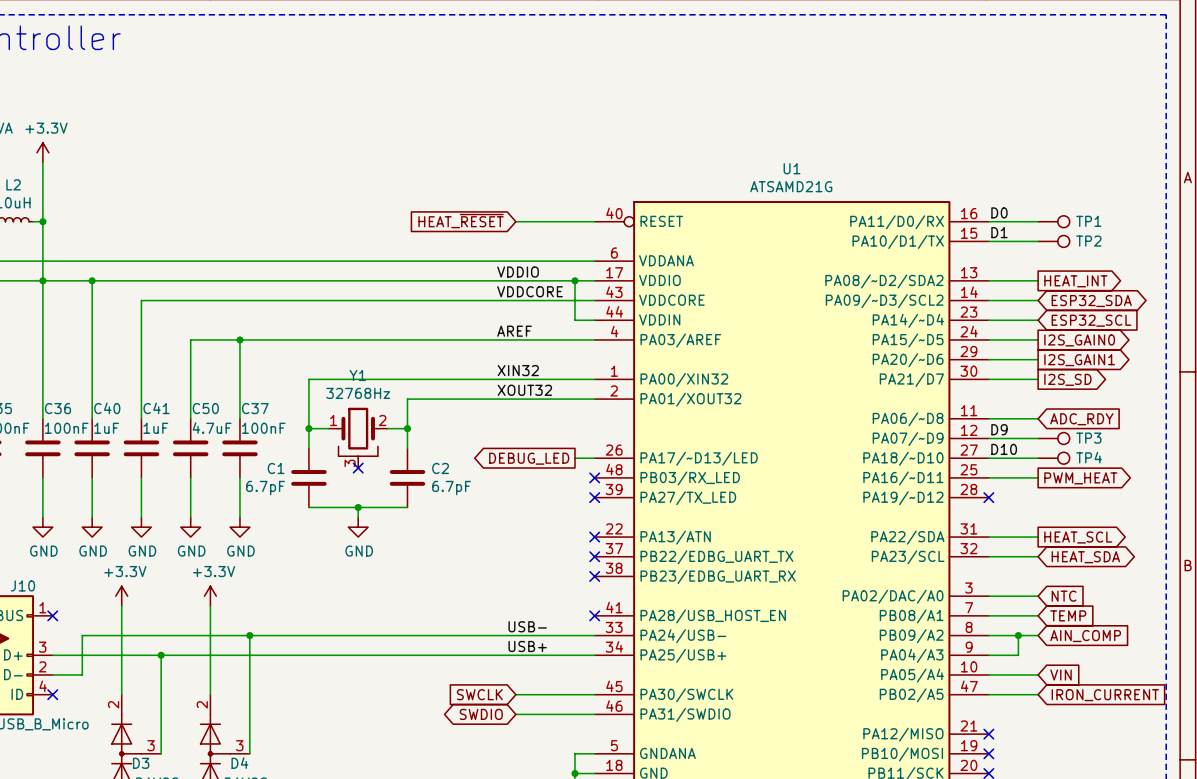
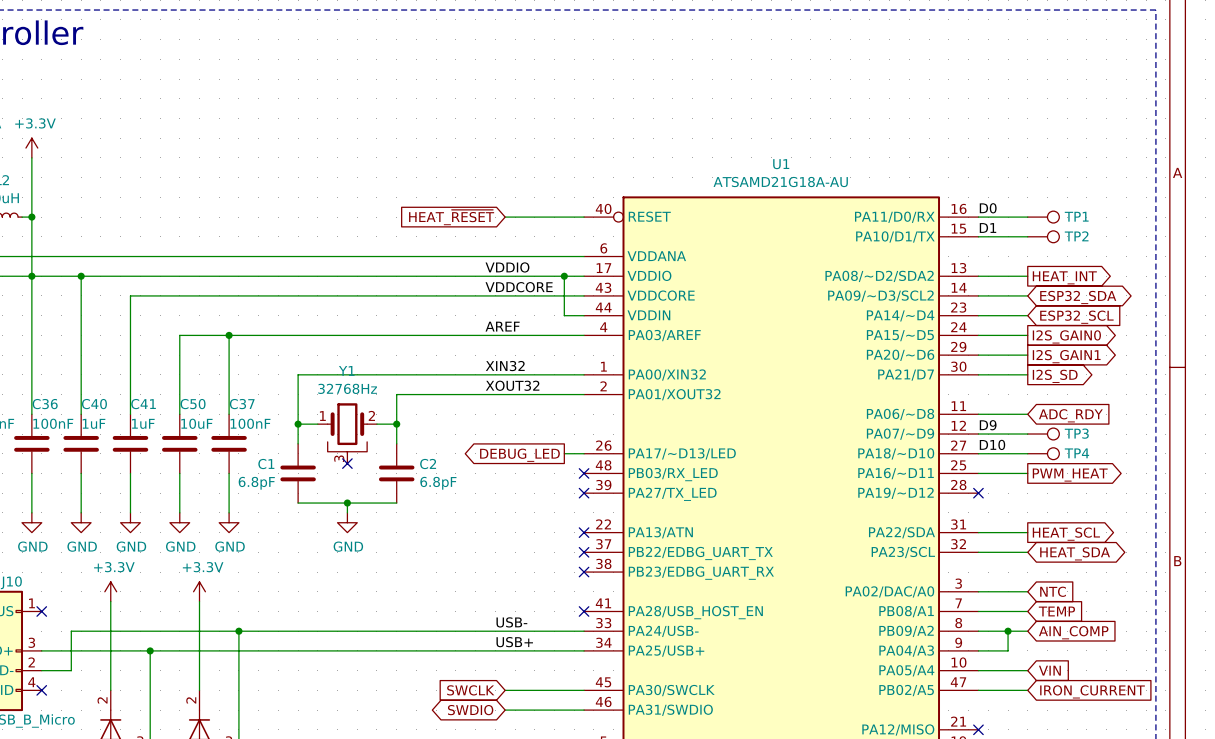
U1 value: ATSAMD21G (791, 186) -> ATSAMD21G18A-AU (780, 182)
C50 value: 4.7uF (212, 428) -> 10uF (196, 423)
C1 value: 6.7pF (265, 488) -> 6.8pF (256, 483)
C2 value: 6.7pF (451, 488) -> 6.8pF (438, 483)

